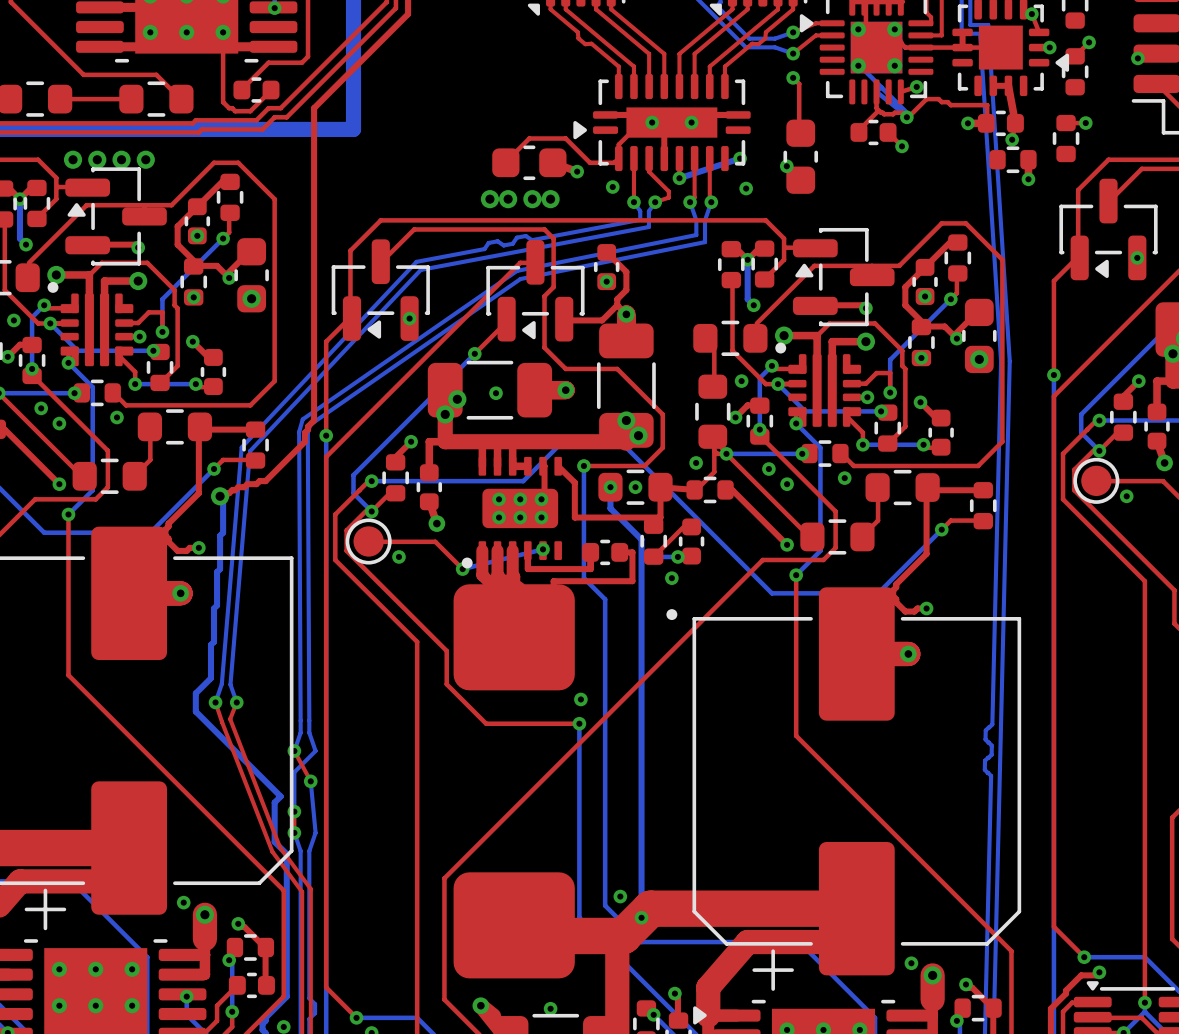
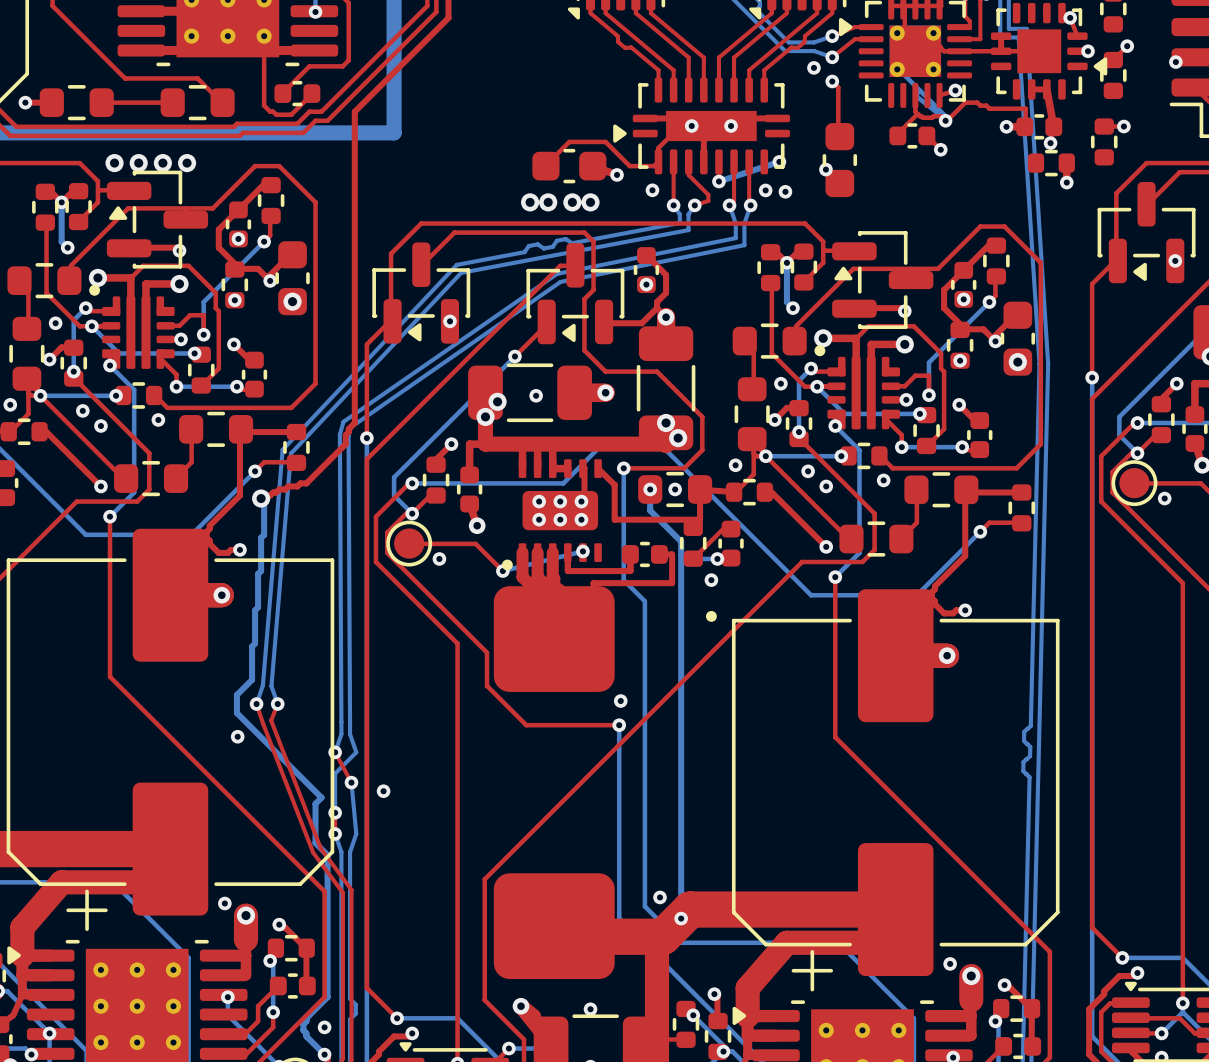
via: none -> (813, 67)
via: none -> (765, 190)
via: none -> (237, 736)
via: none -> (383, 791)

